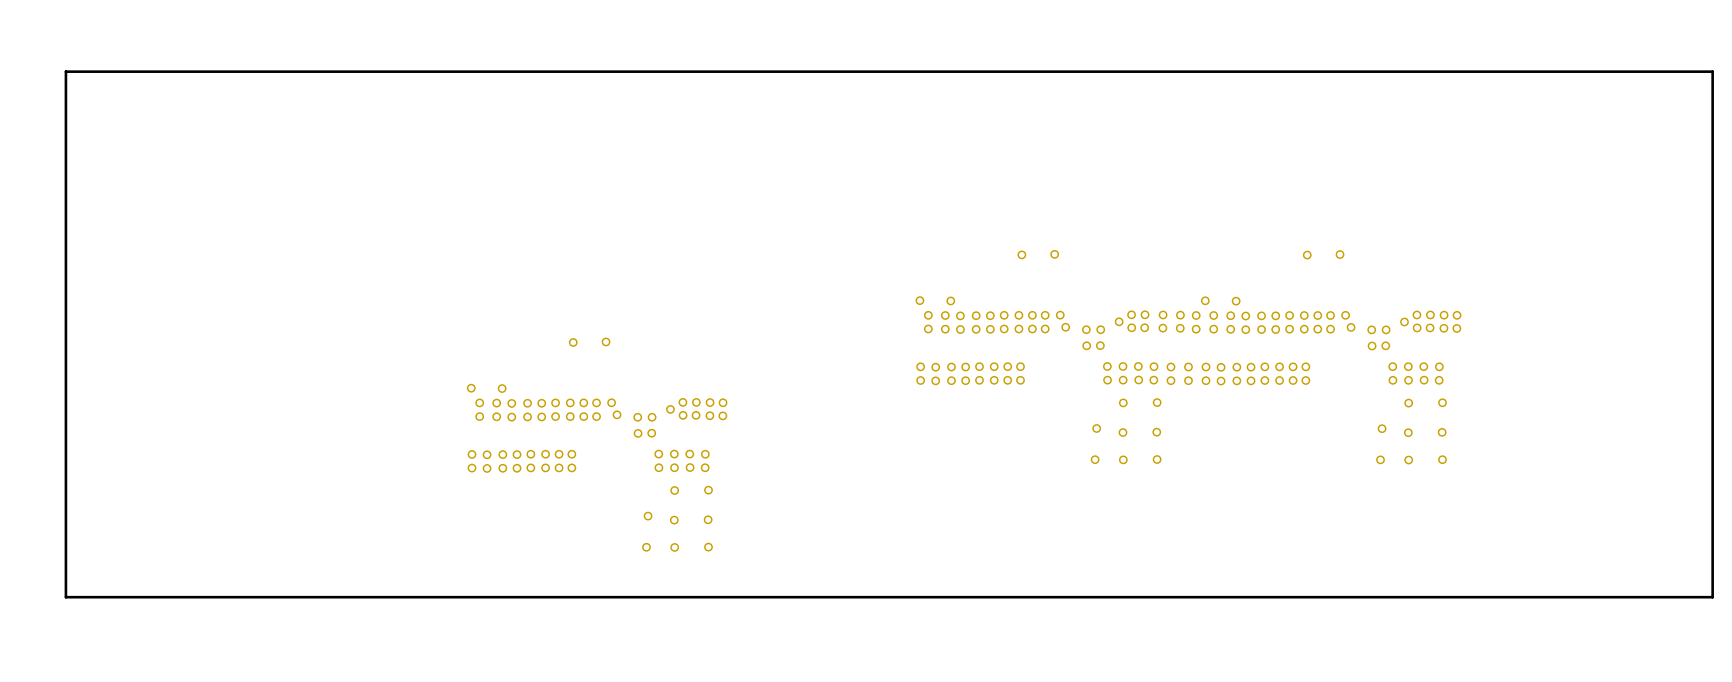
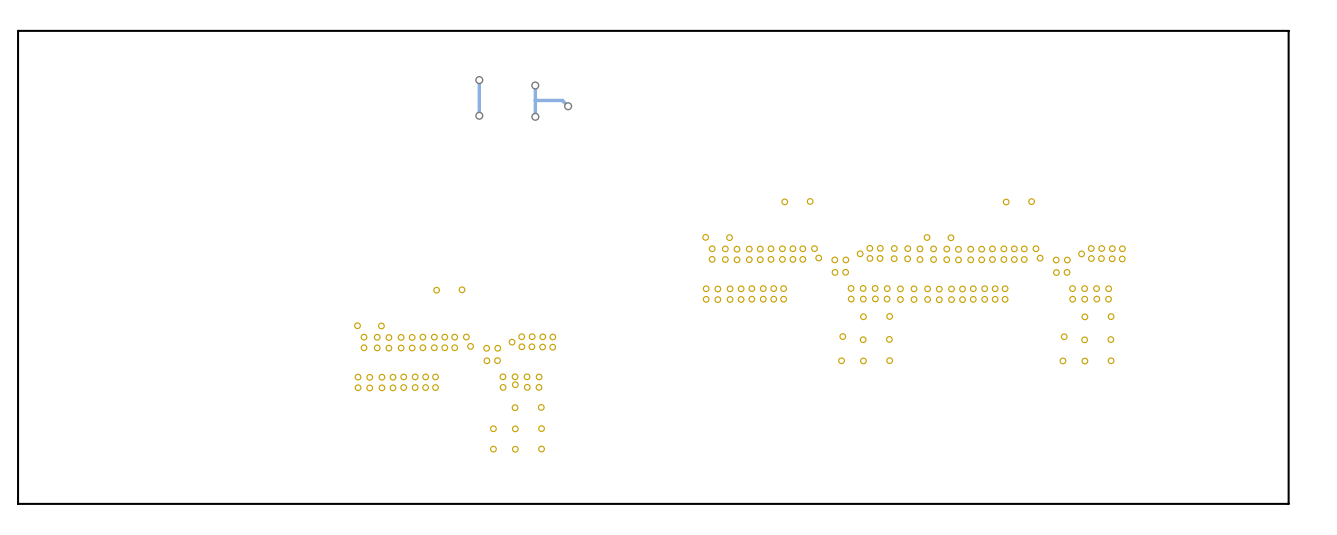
board edge: (1712, 71) (1712, 597) (65, 597) (65, 71) (1712, 71) -> (1288, 30) (1288, 503) (18, 503) (18, 30) (1288, 30)
track: none -> (479, 80) (479, 115)
via: none -> (479, 80)
track: none -> (535, 85) (535, 116)
via: none -> (535, 85)
track: none -> (535, 100) (562, 100) (568, 106)
via: none -> (568, 106)
via: none -> (479, 115)
via: none -> (535, 116)
part: (606, 341) -> none
part: (573, 342) -> none
part: none -> (436, 290)
part: none -> (462, 289)
part: (471, 388) -> none
part: (502, 388) -> none
part: (479, 402) -> none
part: (555, 402) -> none
part: (570, 402) -> none
part: (583, 402) -> none
part: (596, 402) -> none
part: (611, 402) -> none
part: (682, 402) -> none
part: (696, 402) -> none
part: (710, 402) -> none
part: (723, 402) -> none
part: (496, 403) -> none
part: (511, 403) -> none
part: (527, 403) -> none
part: (541, 403) -> none
part: (670, 409) -> none
part: none -> (357, 325)
part: none -> (381, 325)
part: (617, 414) -> none
part: (683, 415) -> none
part: (696, 415) -> none
part: (709, 415) -> none
part: (722, 415) -> none
part: (479, 416) -> none
part: (496, 416) -> none
part: (527, 416) -> none
part: (541, 416) -> none
part: (555, 416) -> none
part: (570, 416) -> none
part: (583, 416) -> none
part: (596, 416) -> none
part: (511, 417) -> none
part: (637, 417) -> none
part: (652, 417) -> none
part: none -> (521, 336)
part: none -> (532, 336)
part: none -> (542, 336)
part: none -> (364, 337)
part: none -> (377, 337)
part: none -> (388, 337)
part: none -> (401, 337)
part: none -> (412, 337)
part: none -> (422, 337)
part: none -> (434, 337)
part: none -> (444, 337)
part: none -> (454, 337)
part: none -> (466, 336)
part: none -> (552, 336)
part: (638, 433) -> none
part: (651, 433) -> none
part: none -> (512, 342)
part: none -> (470, 346)
part: none -> (521, 346)
part: none -> (531, 346)
part: none -> (542, 347)
part: none -> (364, 347)
part: none -> (422, 347)
part: none -> (434, 347)
part: none -> (444, 347)
part: none -> (454, 347)
part: none -> (552, 347)
part: none -> (377, 347)
part: none -> (388, 348)
part: none -> (401, 348)
part: none -> (412, 348)
part: none -> (486, 348)
part: none -> (497, 348)
part: (471, 454) -> none
part: (487, 454) -> none
part: (502, 454) -> none
part: (517, 454) -> none
part: (530, 454) -> none
part: (545, 454) -> none
part: (559, 454) -> none
part: (571, 454) -> none
part: (658, 454) -> none
part: (674, 454) -> none
part: (689, 454) -> none
part: (705, 454) -> none
part: none -> (486, 360)
part: none -> (497, 360)
part: (530, 467) -> none
part: (545, 467) -> none
part: (559, 467) -> none
part: (571, 467) -> none
part: (658, 467) -> none
part: (674, 467) -> none
part: (690, 467) -> none
part: (705, 467) -> none
part: (471, 468) -> none
part: (487, 468) -> none
part: (502, 468) -> none
part: (517, 468) -> none
part: none -> (358, 377)
part: none -> (381, 377)
part: none -> (392, 377)
part: none -> (403, 376)
part: none -> (415, 376)
part: none -> (425, 376)
part: none -> (435, 376)
part: none -> (502, 376)
part: none -> (515, 376)
part: none -> (527, 376)
part: none -> (539, 376)
part: none -> (369, 377)
part: (708, 490) -> none
part: none -> (527, 387)
part: none -> (358, 387)
part: none -> (369, 387)
part: none -> (381, 387)
part: none -> (392, 387)
part: none -> (403, 387)
part: none -> (415, 387)
part: none -> (425, 387)
part: none -> (435, 387)
part: none -> (503, 387)
part: none -> (538, 387)
part: (648, 516) -> none
part: none -> (493, 449)
part: none -> (515, 449)
part: none -> (541, 448)

